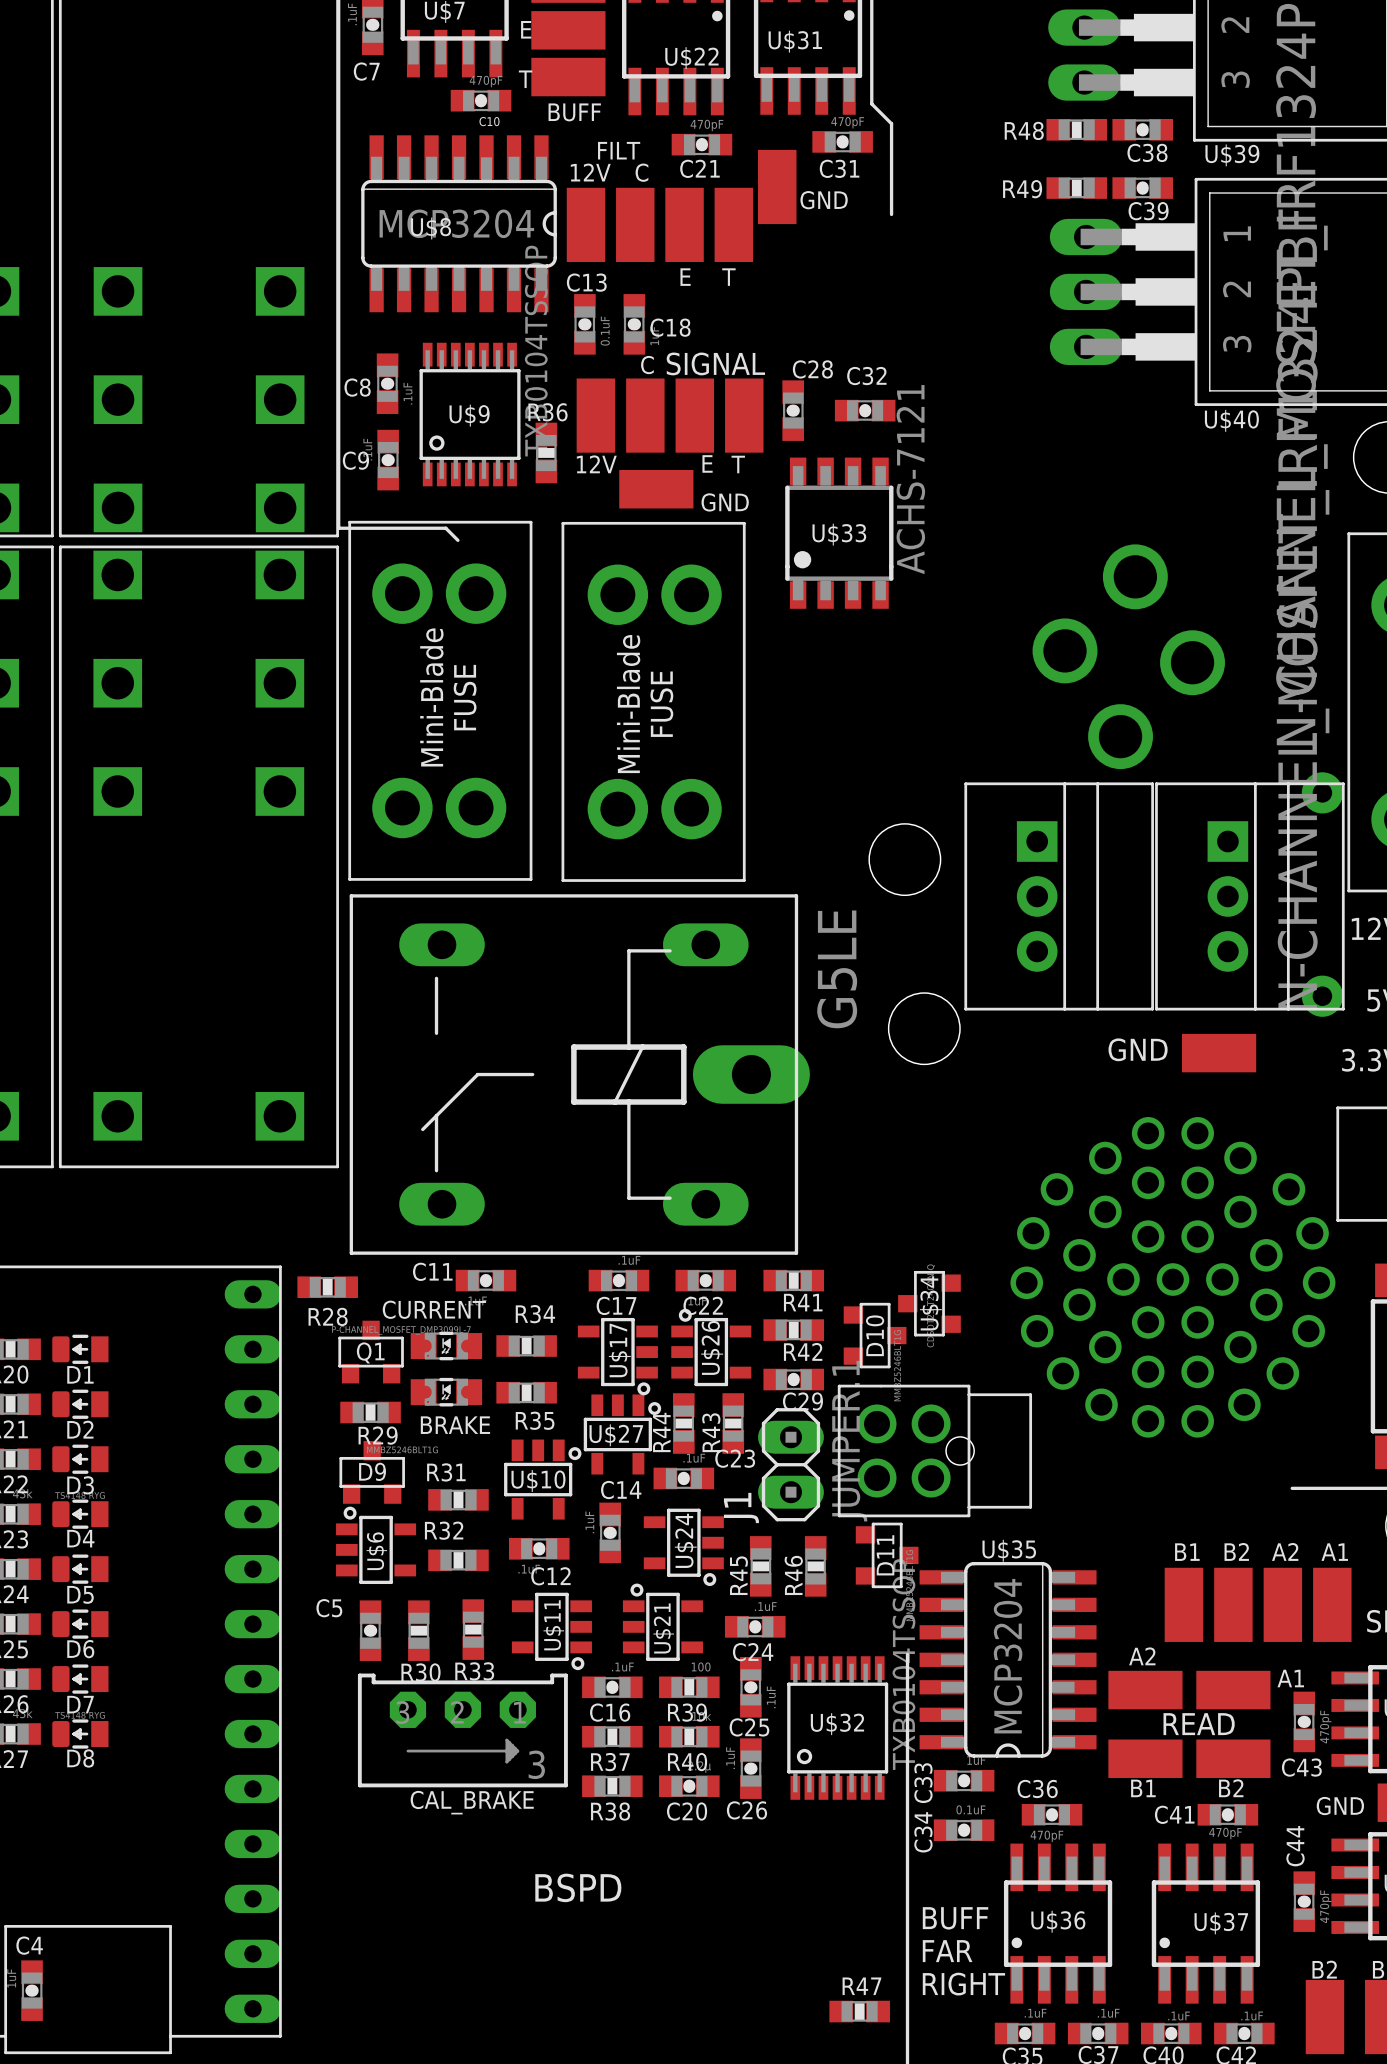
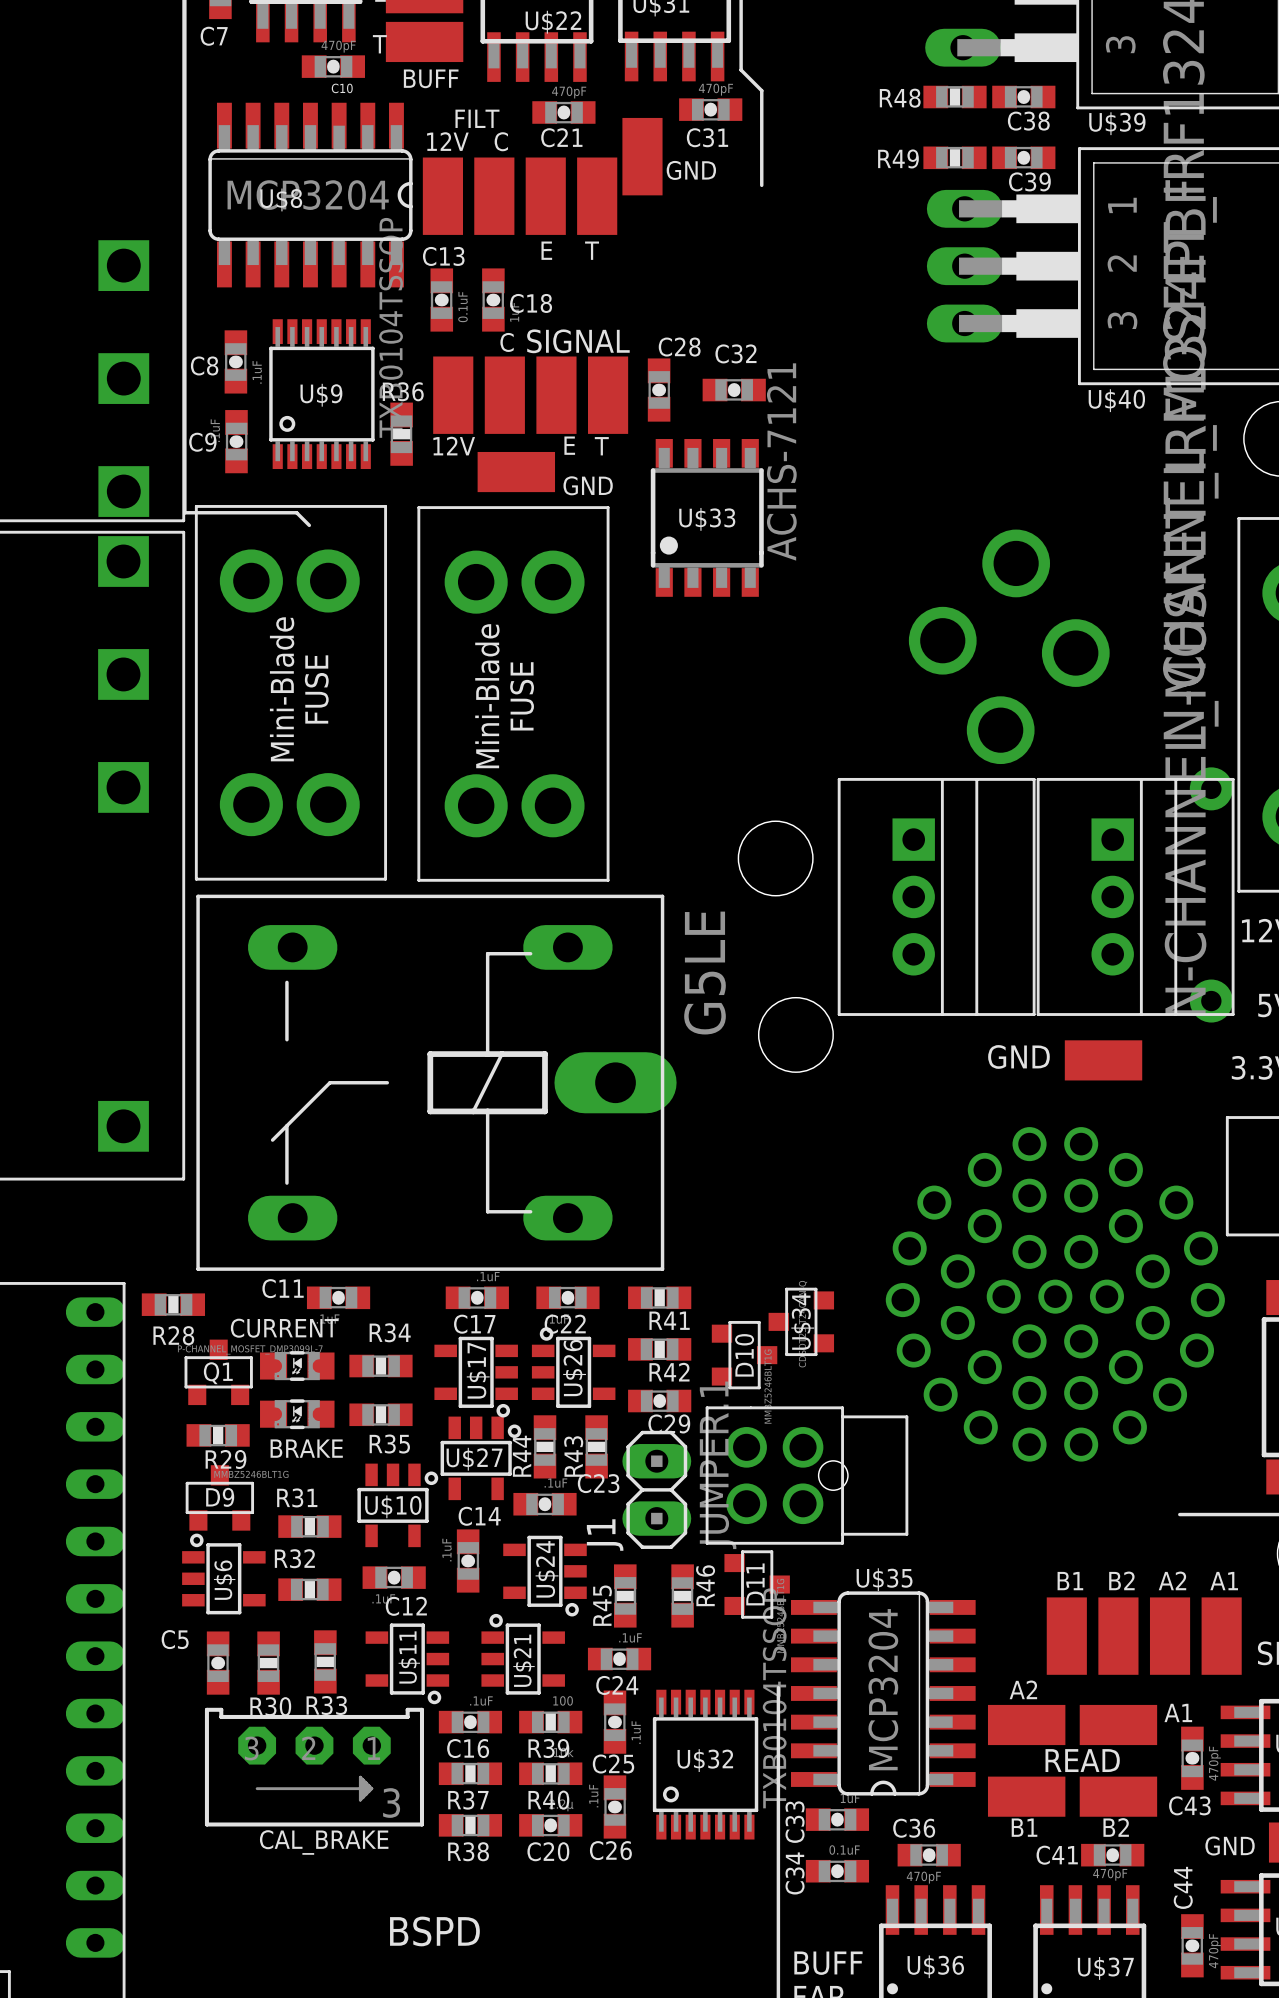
R46 name position: R46 (793, 1575) -> R46 (705, 1585)

